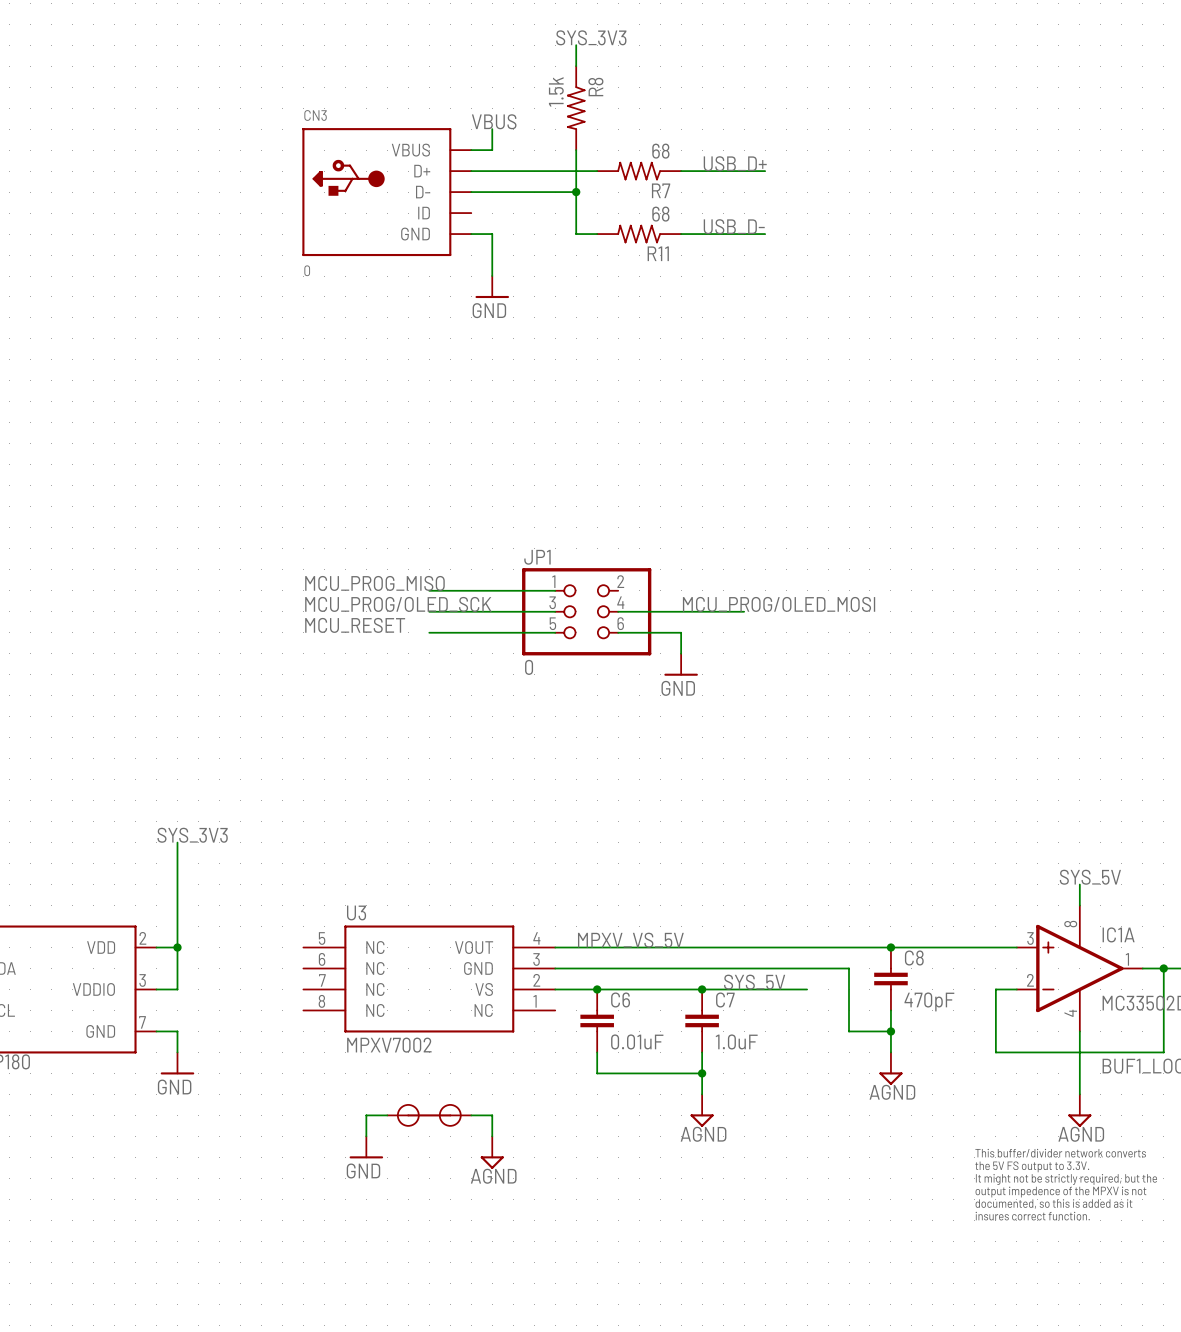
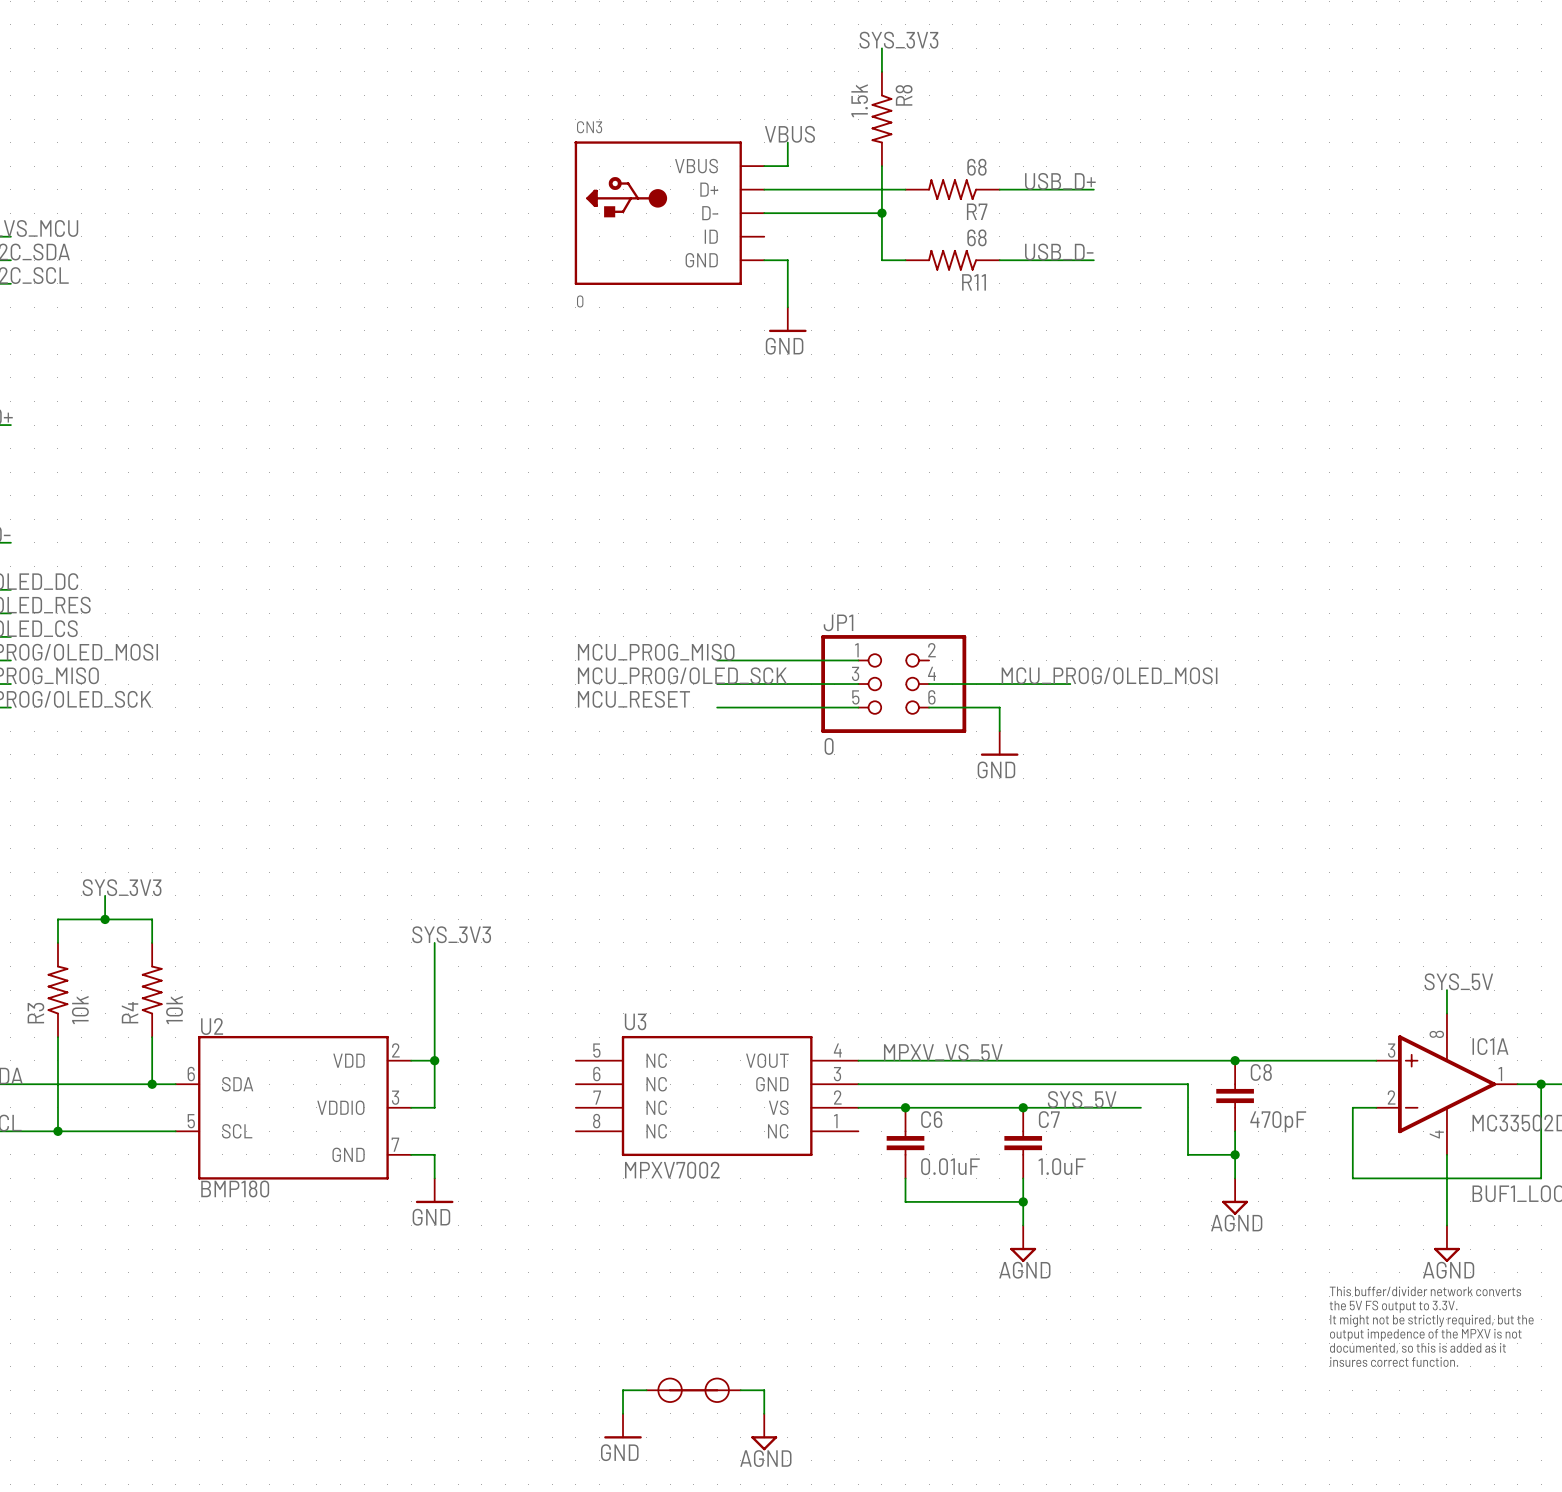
wire: (387, 1115) (366, 1115) (366, 1136) -> (646, 1390) (623, 1390) (623, 1413)
part position: (429, 1115) -> (693, 1390)
wire: (471, 1115) (492, 1115) (492, 1136) -> (740, 1390) (764, 1390) (764, 1413)
power symbol position: GND (366, 1147) -> GND (623, 1426)
power symbol position: AGND (492, 1152) -> AGND (764, 1432)

